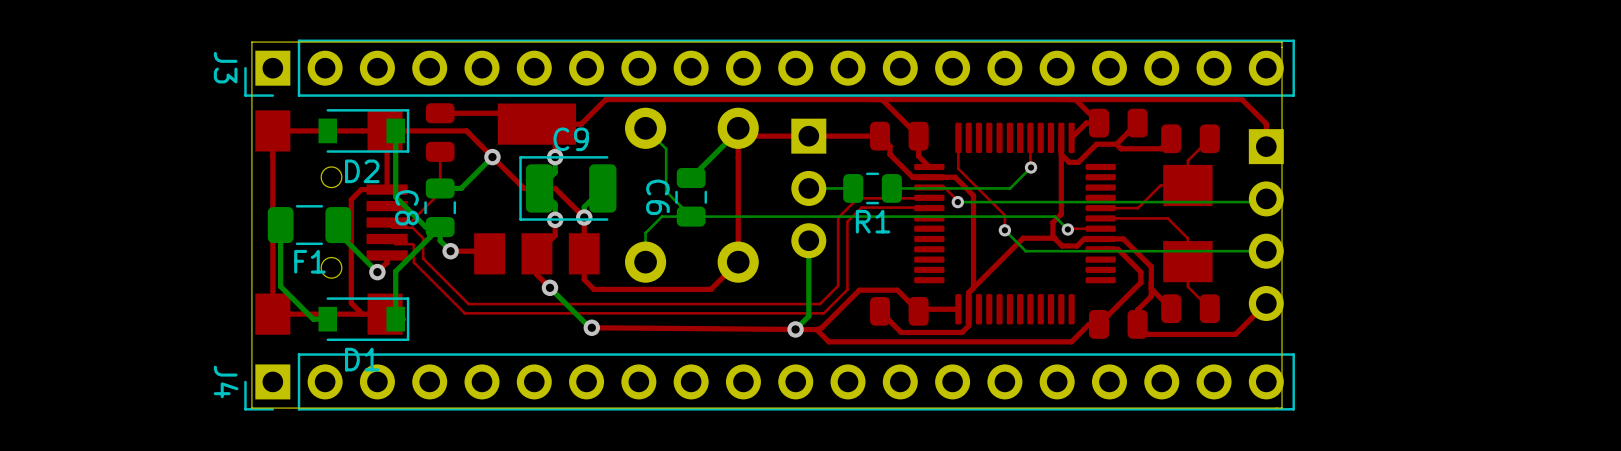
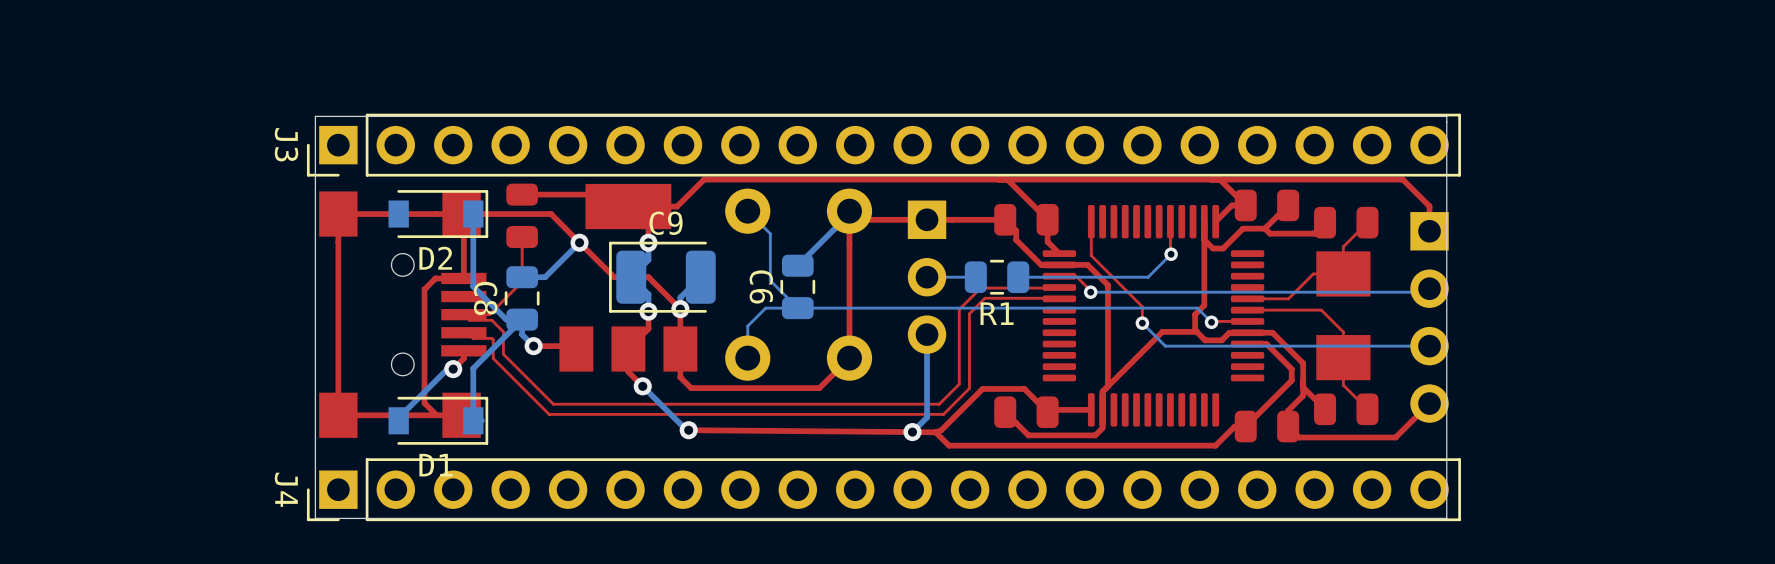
bottom track: (280, 225) (280, 286) (313, 319) (327, 319) -> none
F1: (309, 225) -> none
bottom track: (338, 225) (338, 232) (377, 272) -> none
bottom track: none -> (447, 369) (398, 417)

